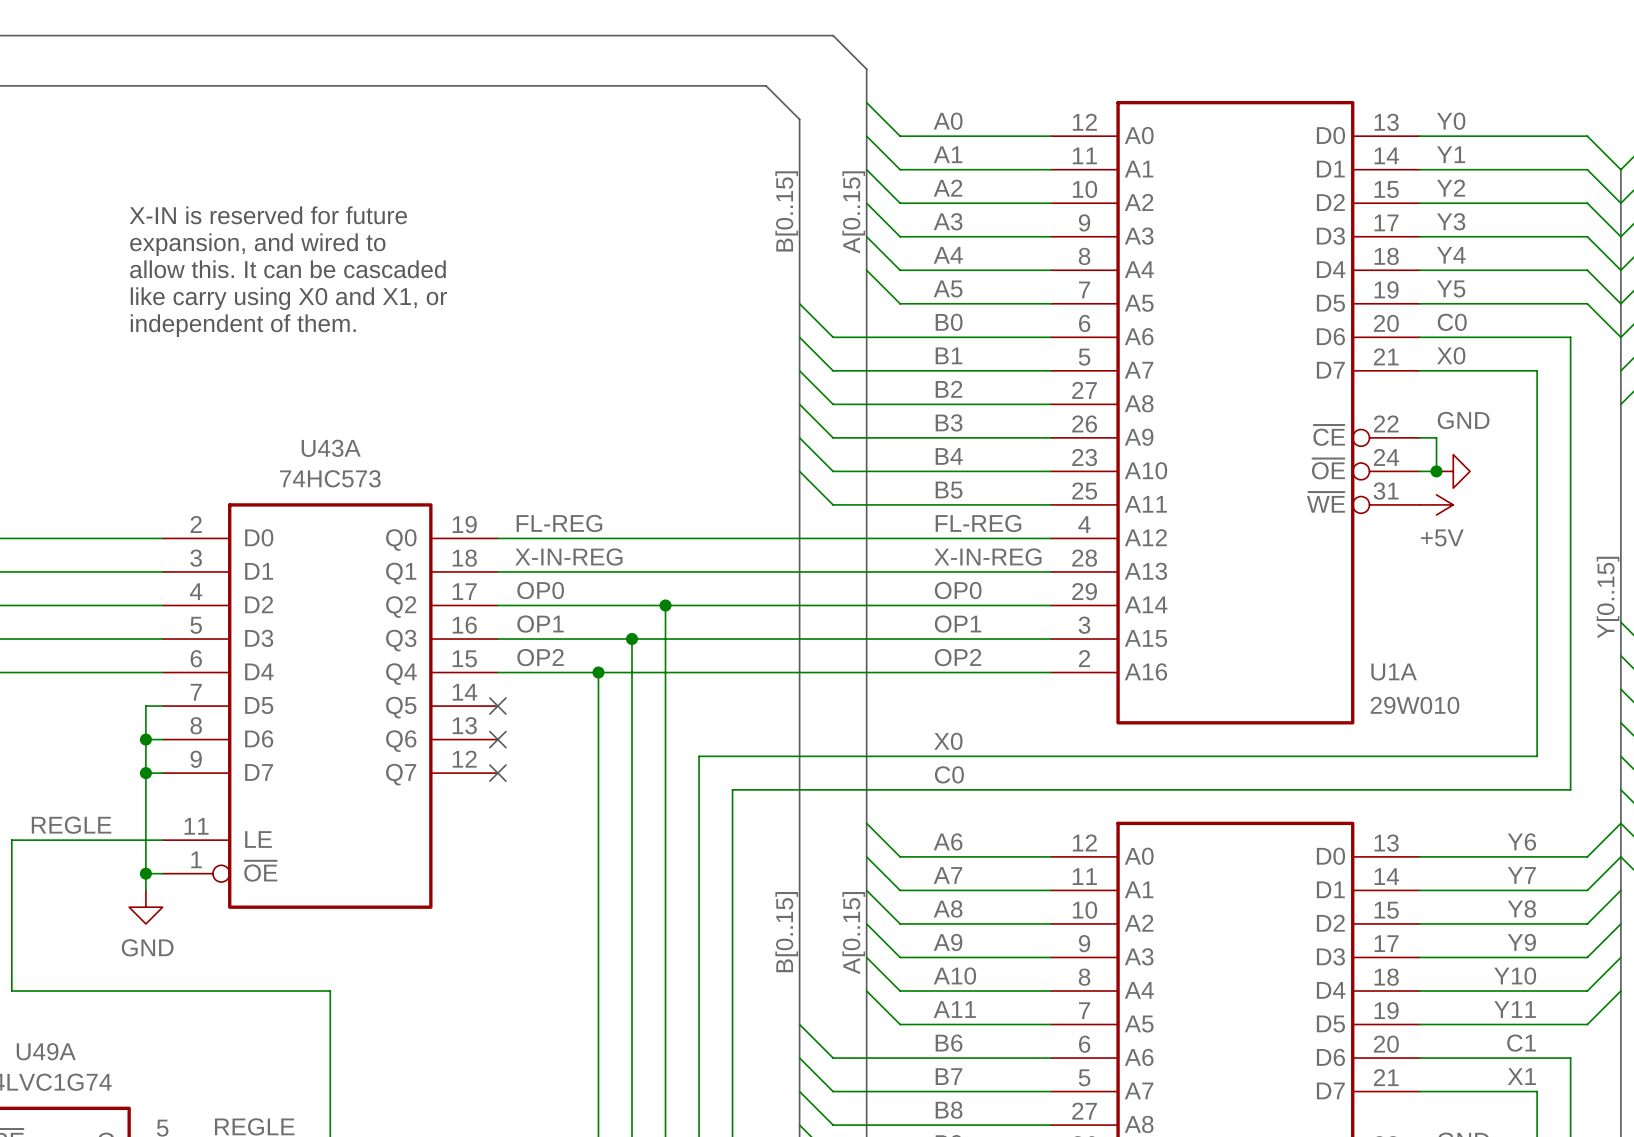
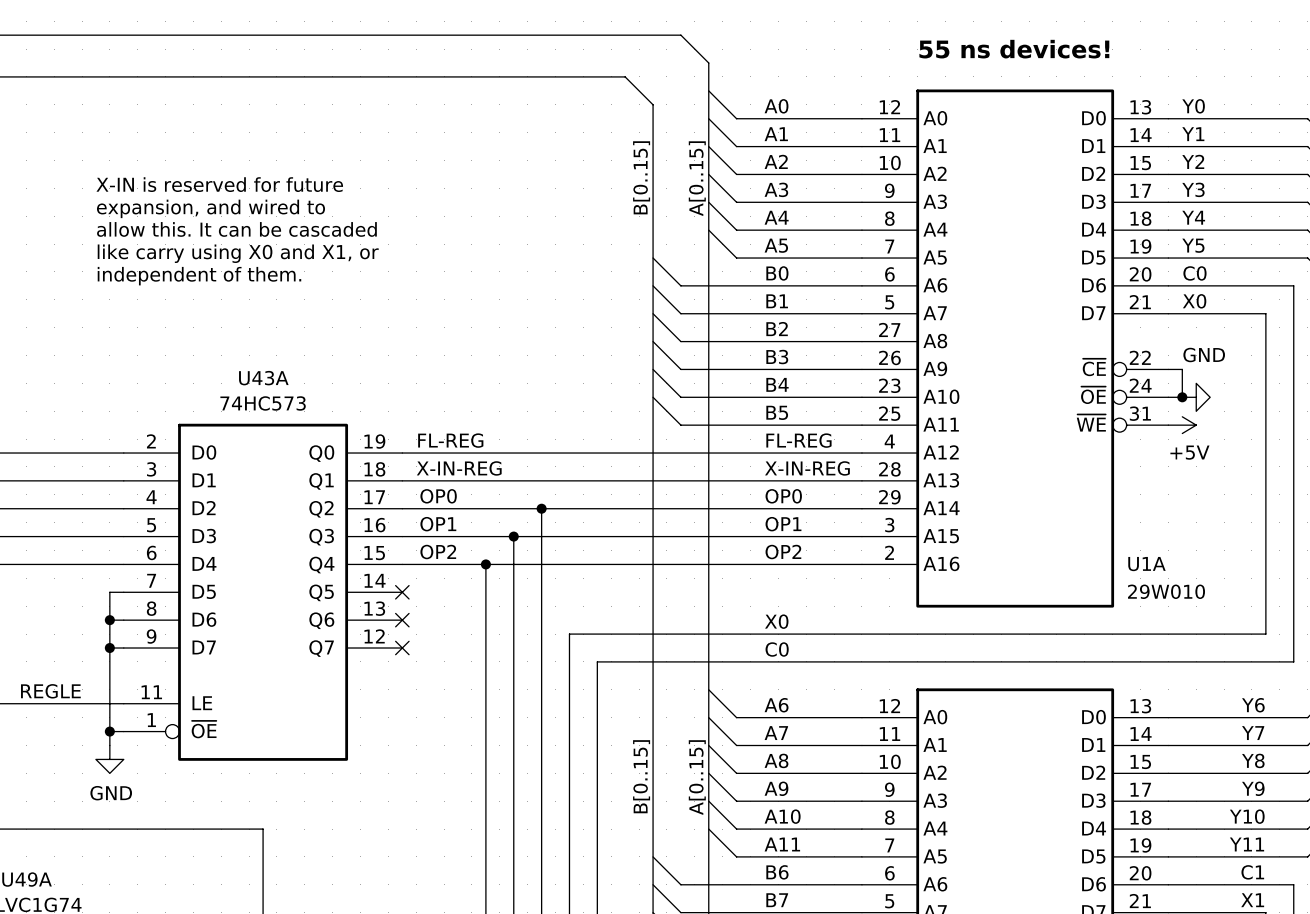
text: none -> 55 ns devices! (1014, 49)

